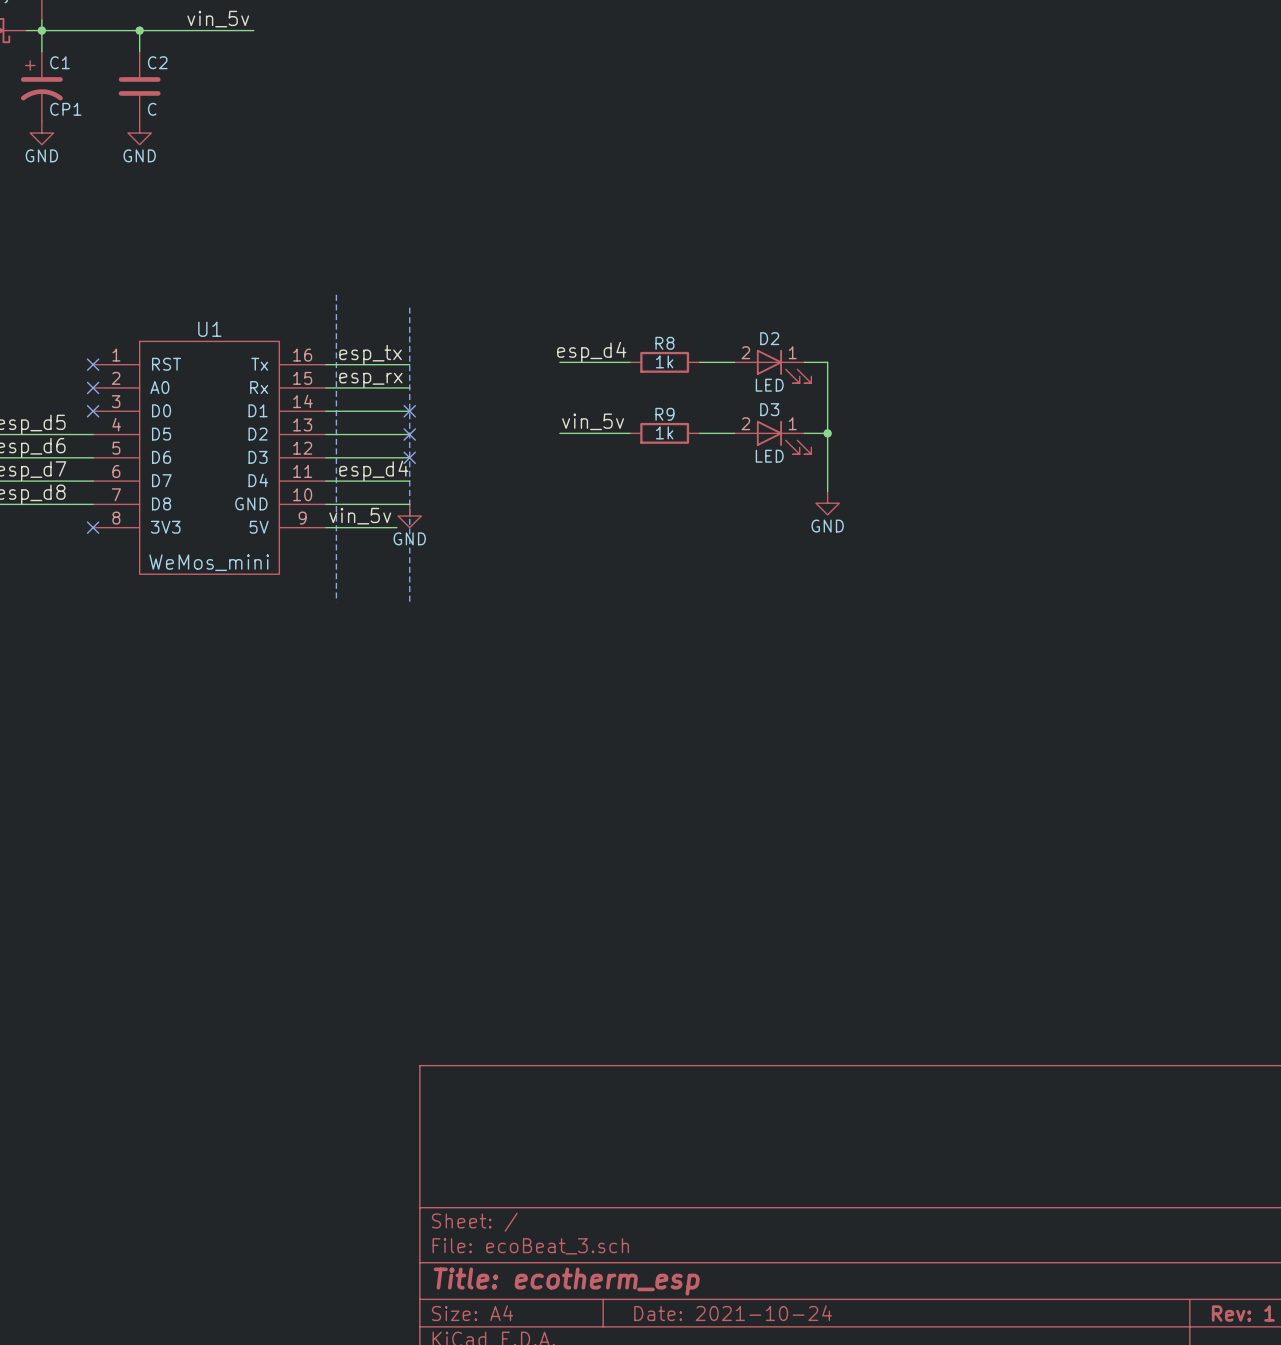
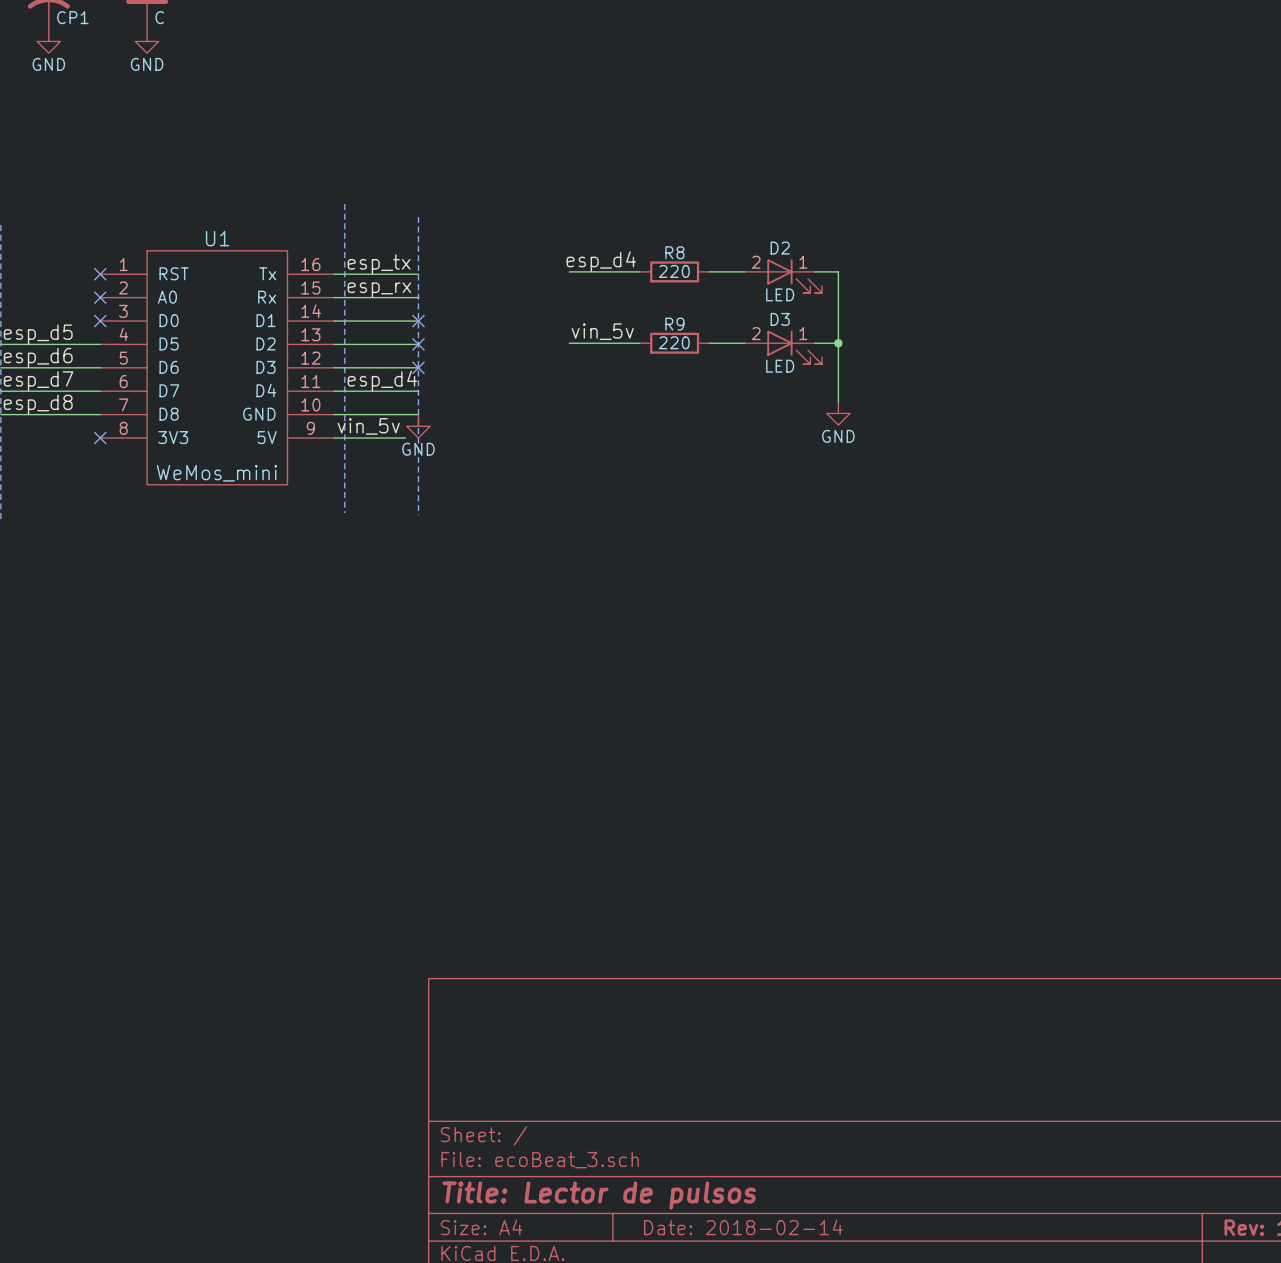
R8 value: 1k (664, 361) -> 220 (674, 271)
R9 value: 1k (664, 432) -> 220 (674, 342)
title block: Title: ecotherm_esp (566, 1281) -> Title: Lector de pulsos (599, 1195)
title block: Date: 2021-10-24 (733, 1313) -> Date: 2018-02-14 (743, 1227)

